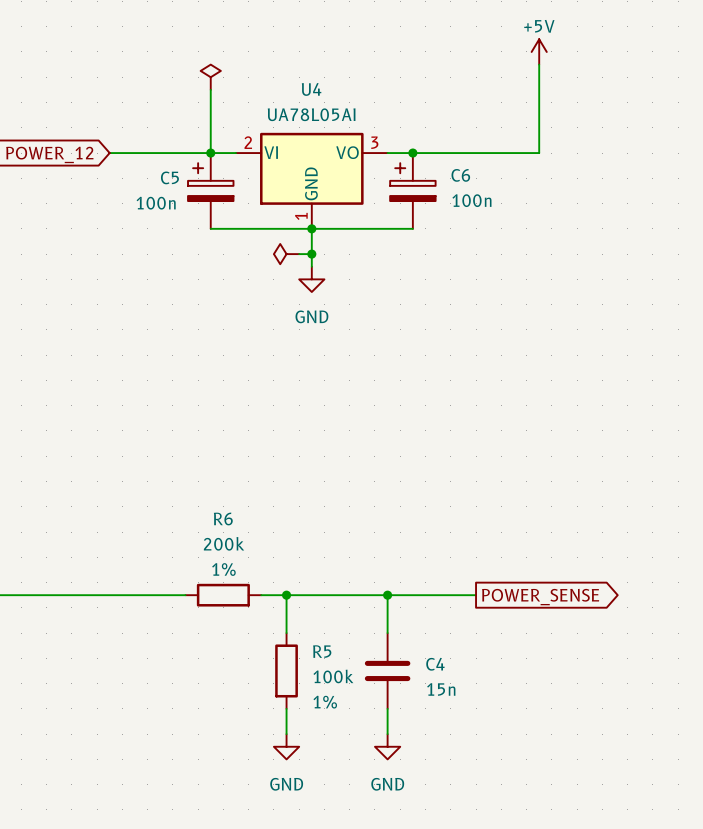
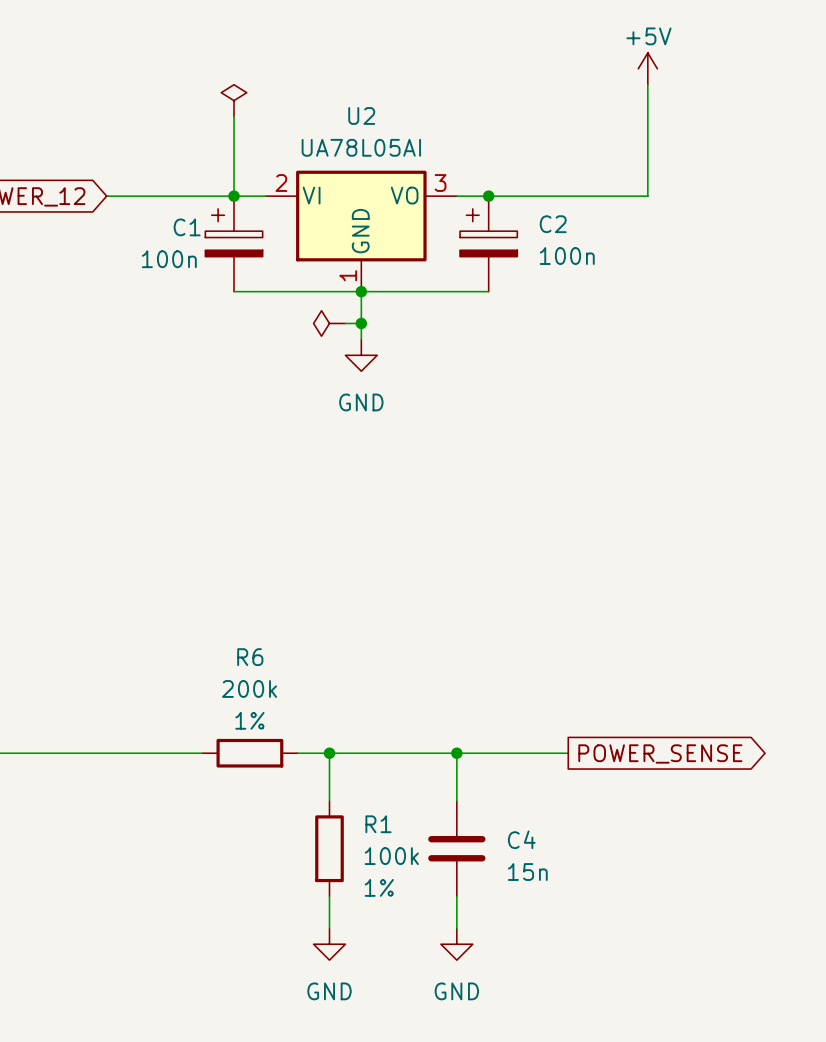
U4 name: U4 (311, 89) -> U2 (361, 115)
C6 name: C6 (460, 175) -> C2 (553, 224)
C5 name: C5 (169, 177) -> C1 (187, 227)
R5 name: R5 (322, 651) -> R1 (378, 824)

